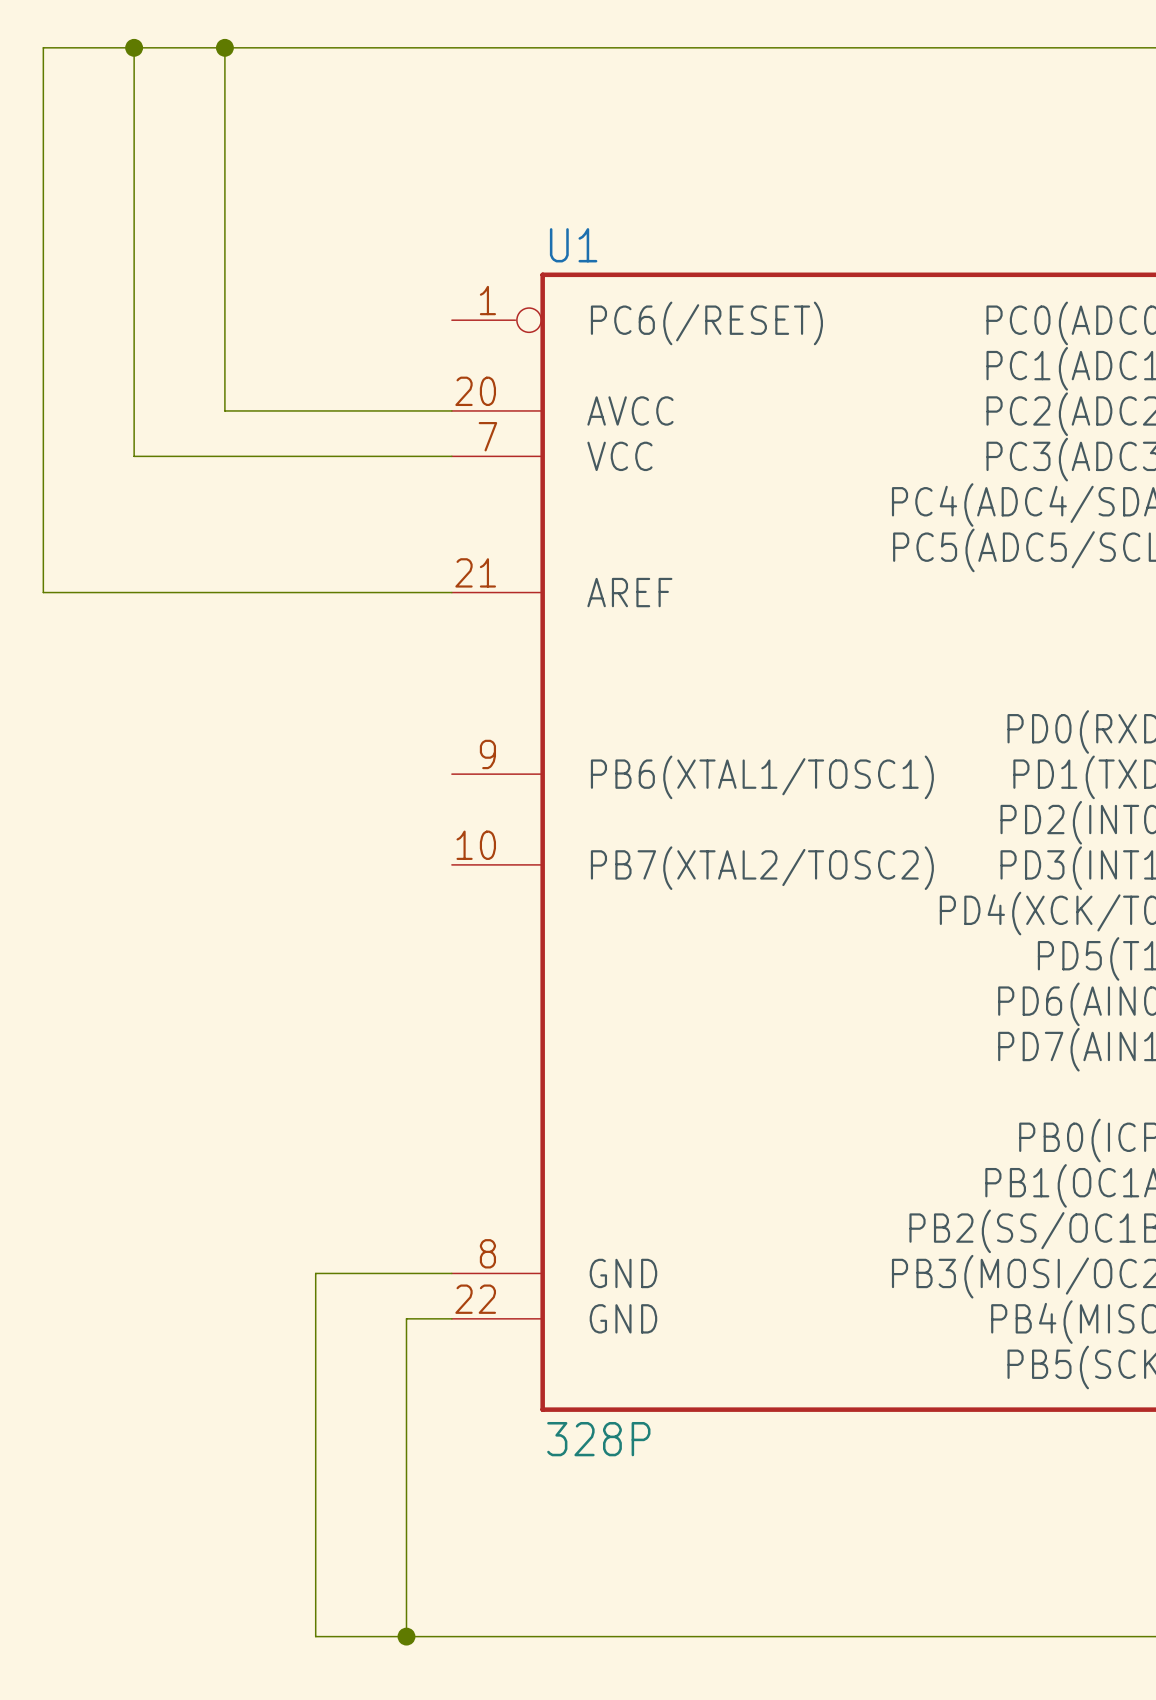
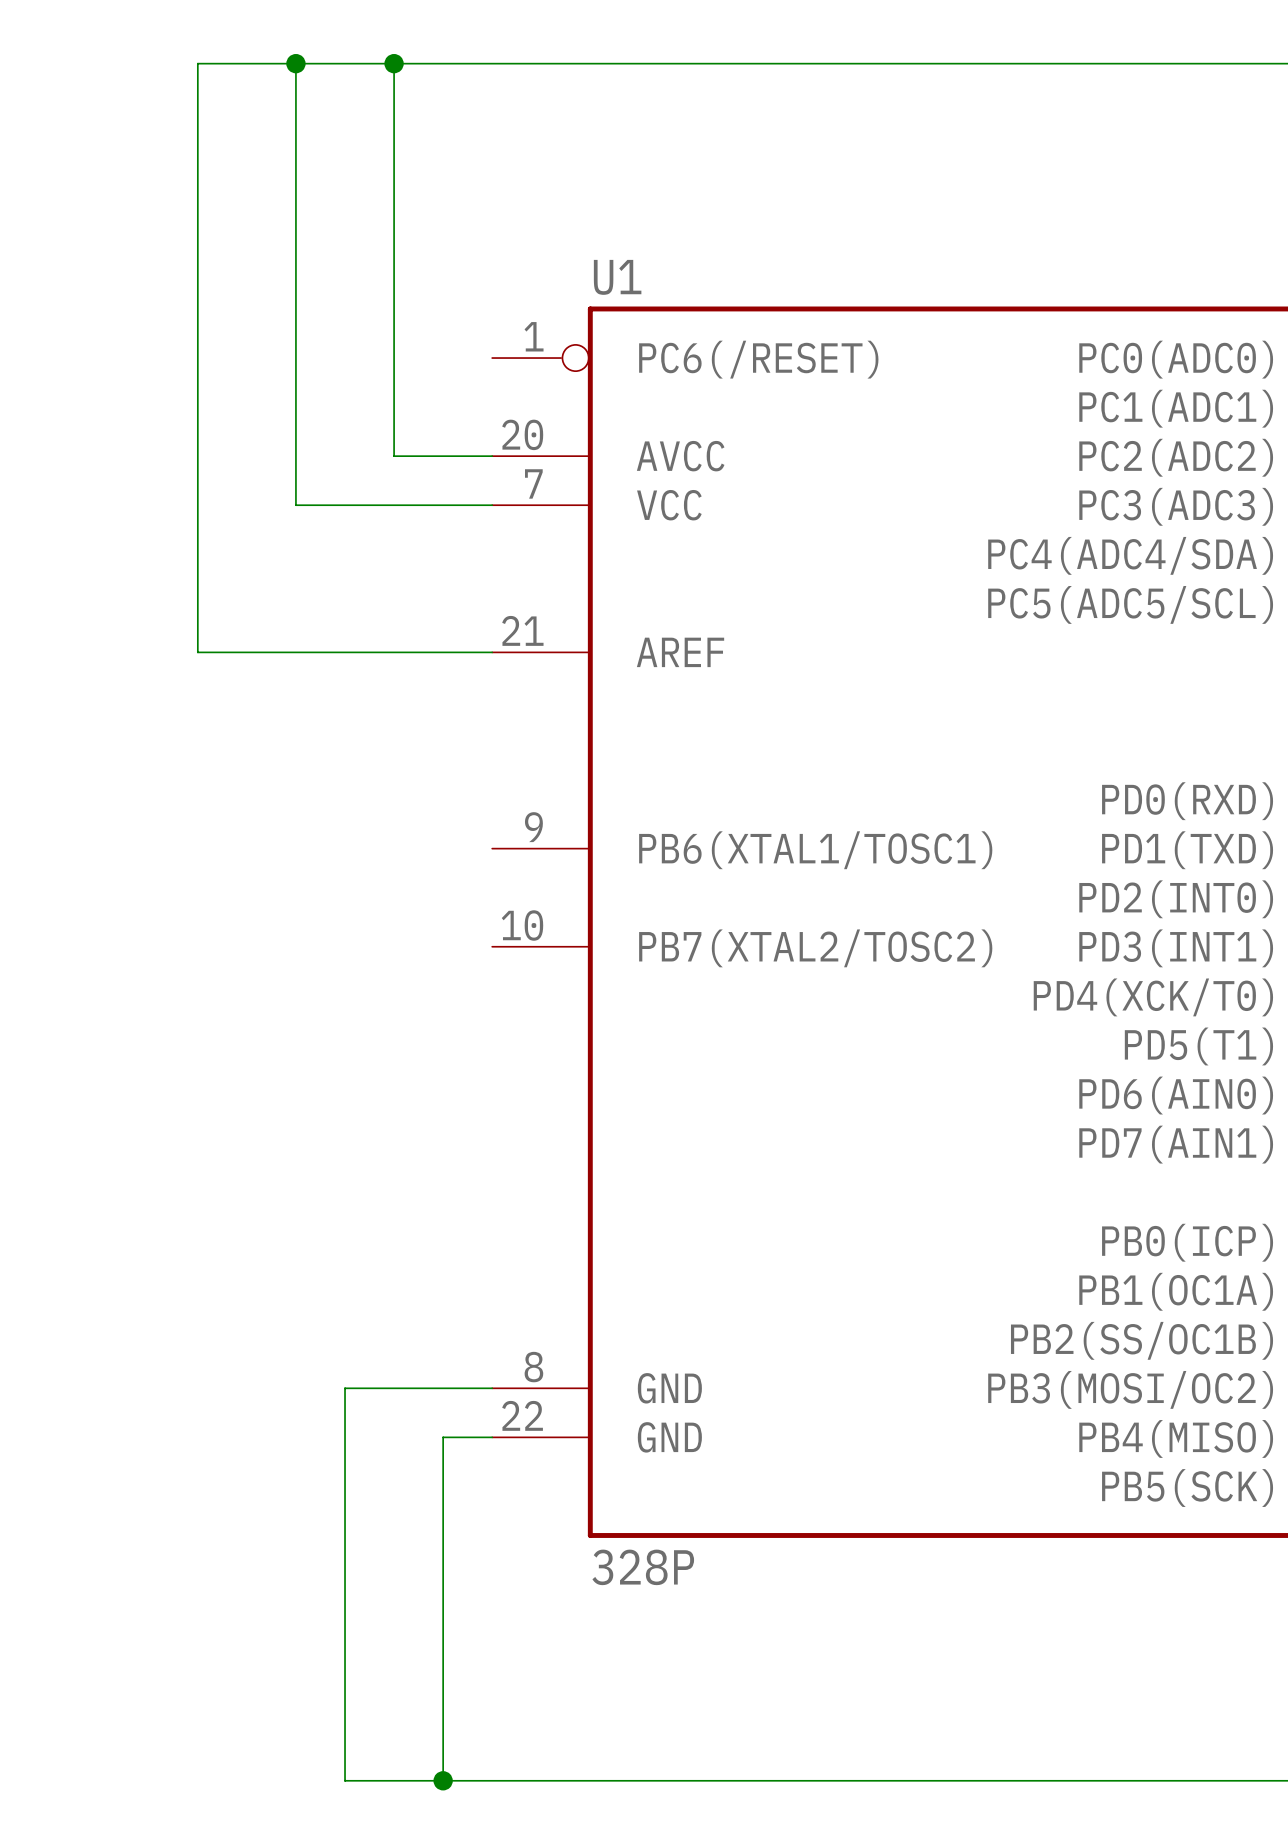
wire: (134, 47) (134, 456) (270, 456) -> (295, 63) (295, 505)
junction: (134, 47) -> none
wire: (179, 47) (43, 47) (43, 592) (179, 592) -> (197, 63) (197, 652)
wire: (224, 47) (224, 410) (361, 410) -> (394, 63) (394, 456)
junction position: (224, 47) -> (295, 63)
junction: none -> (394, 63)

